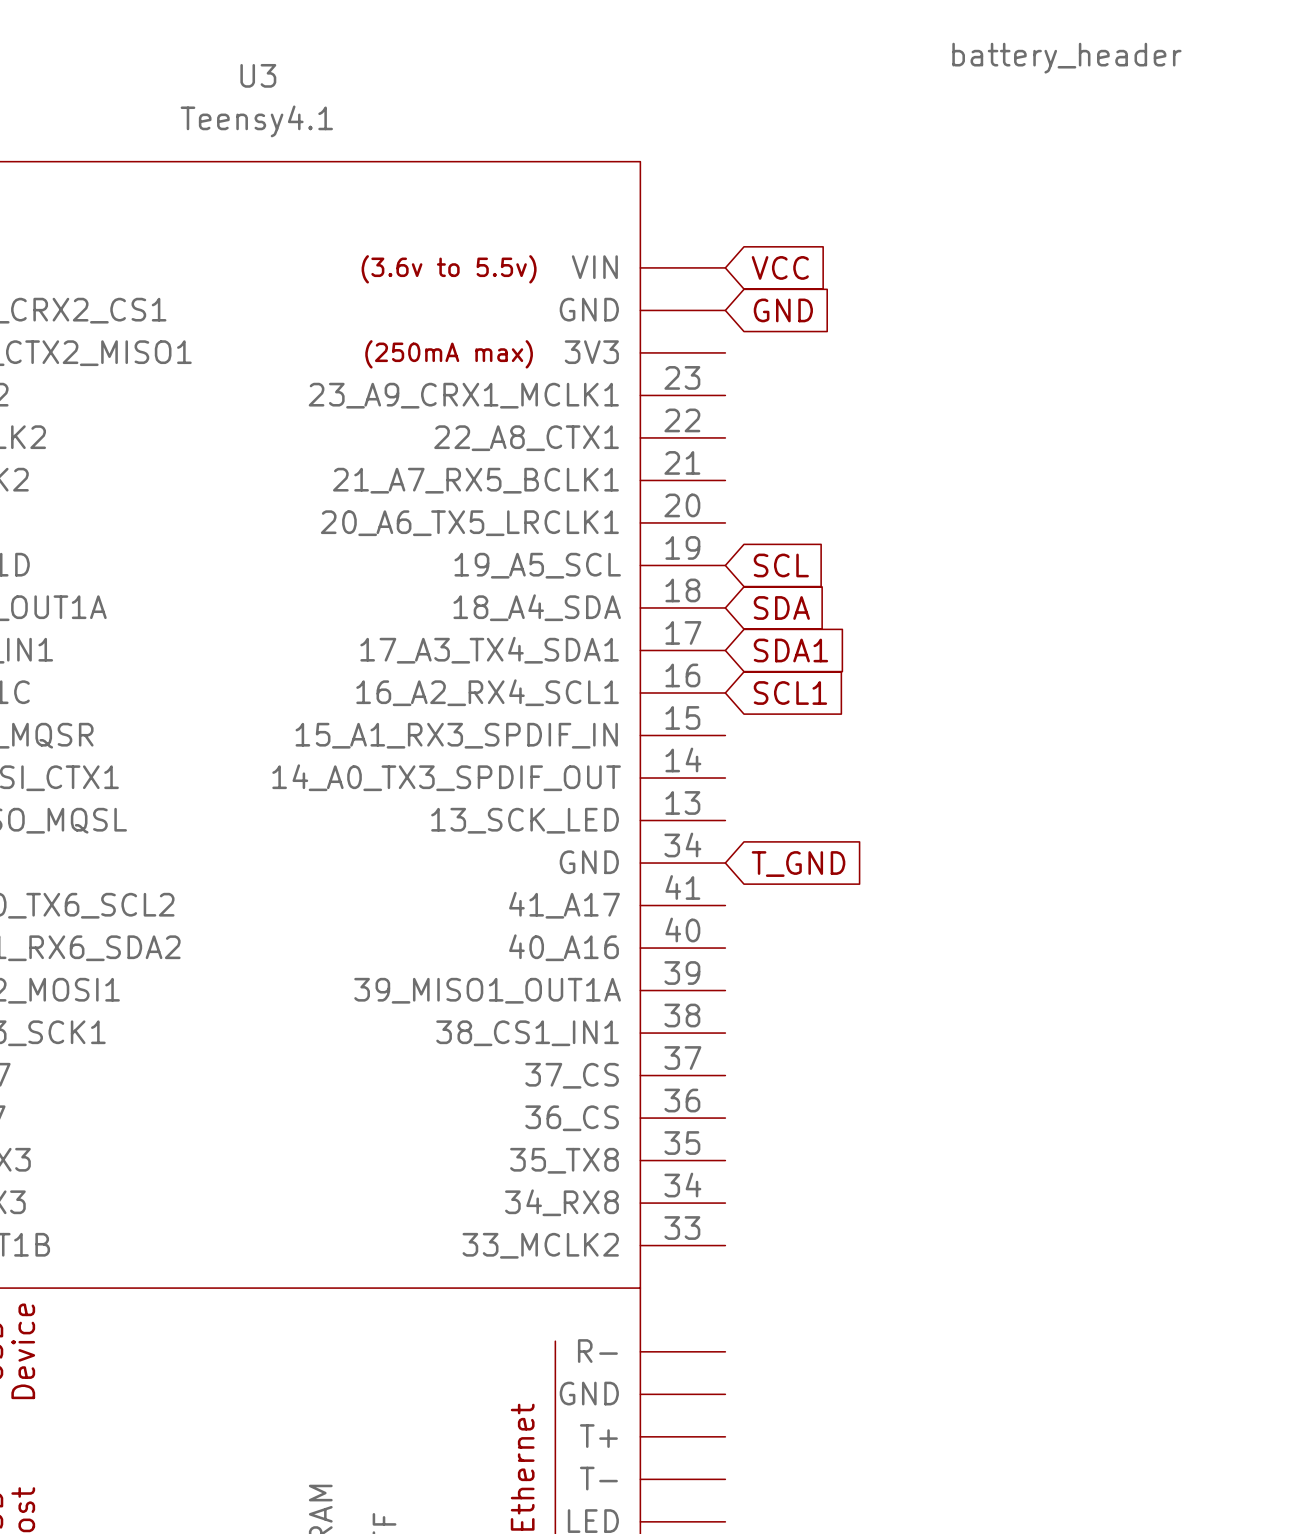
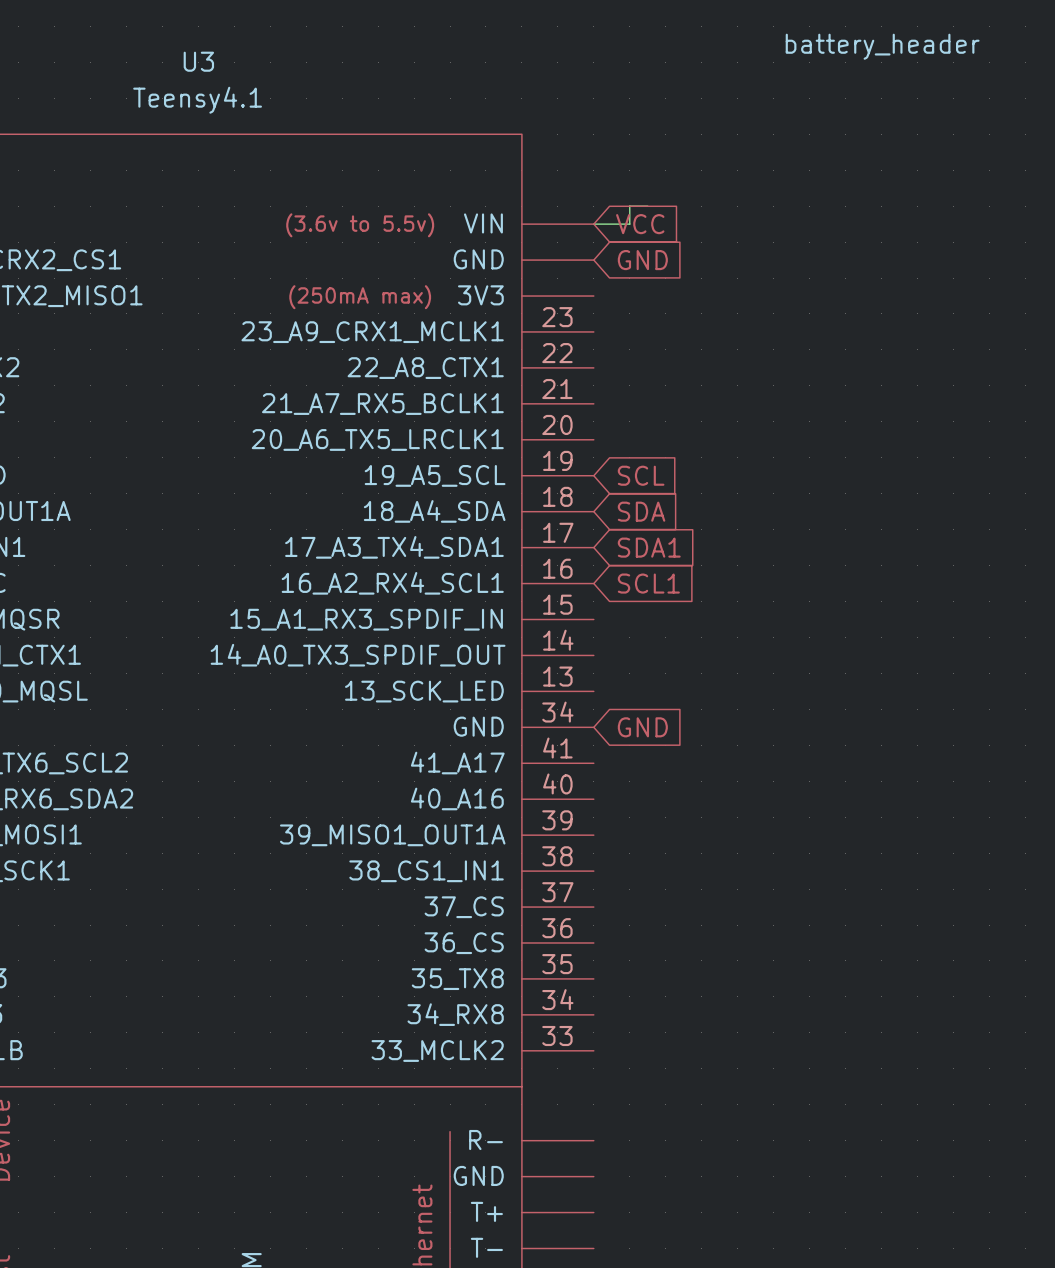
wire: none -> (647, 206) (629, 206) (629, 224) (593, 224)
global label: T_GND (798, 864) -> GND (642, 727)

